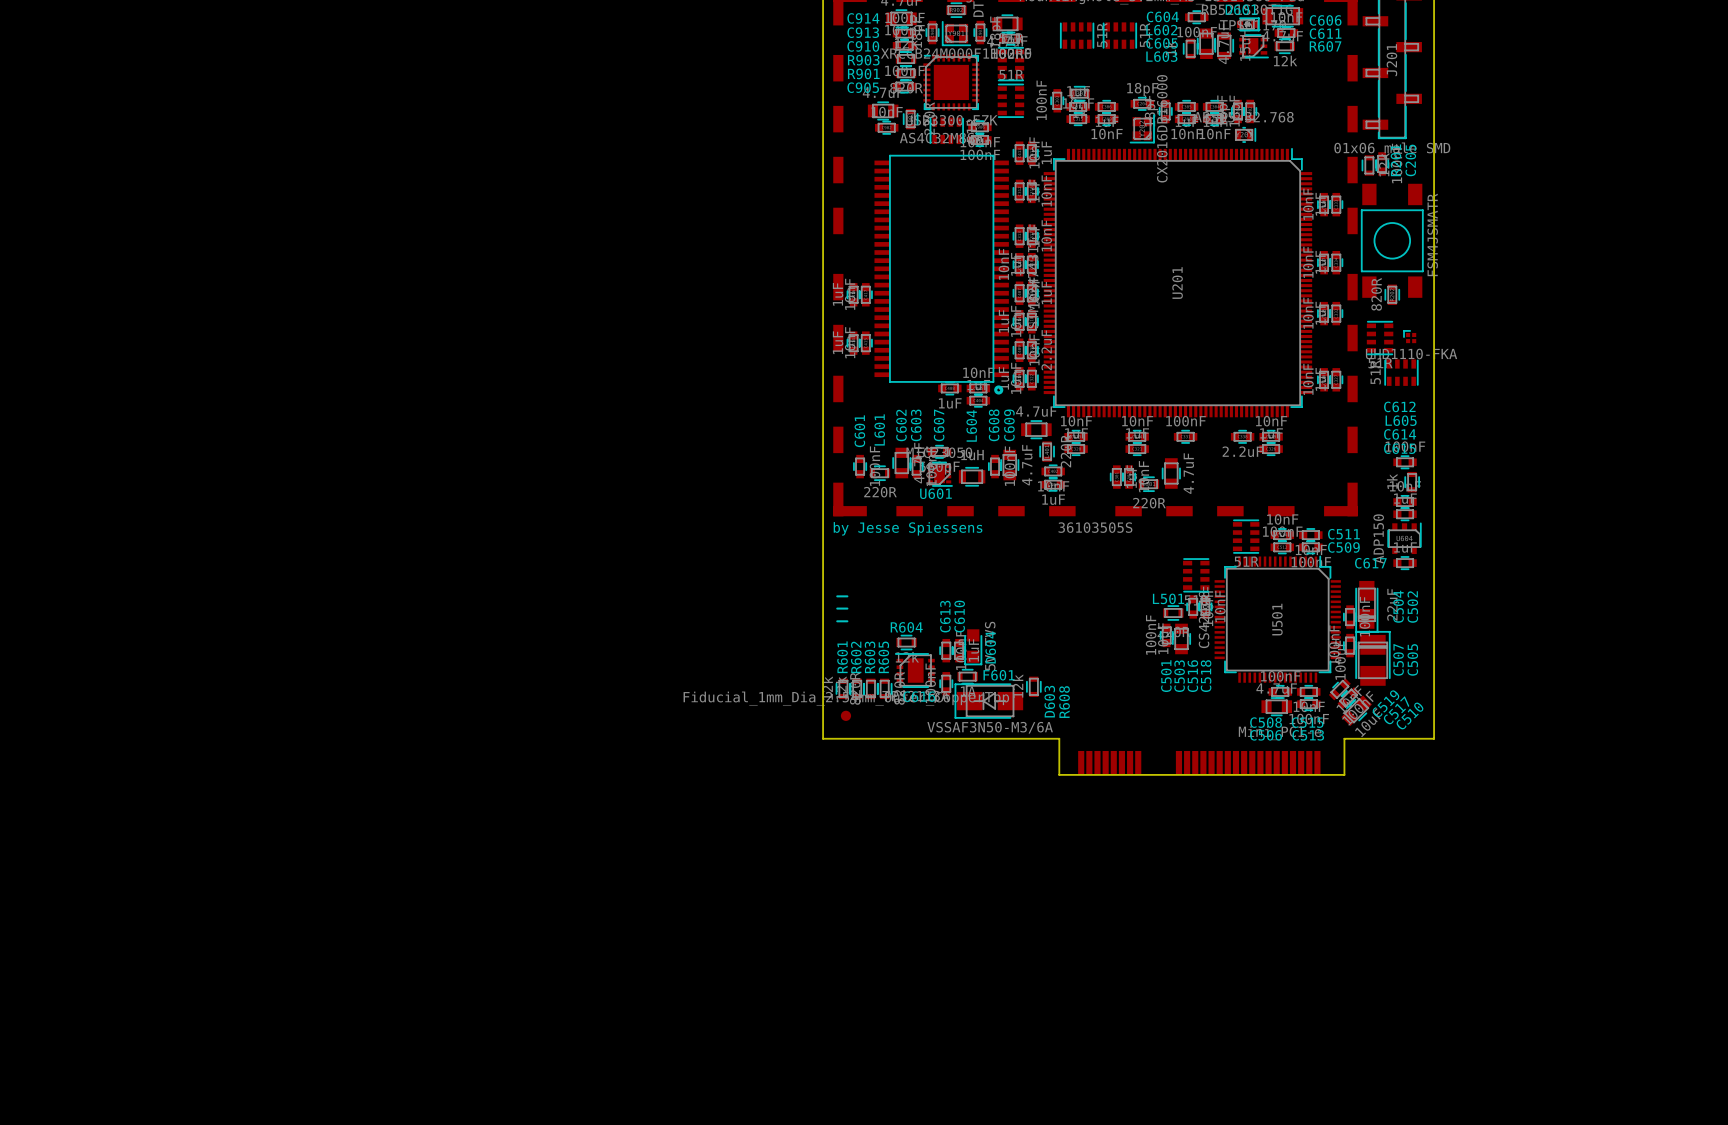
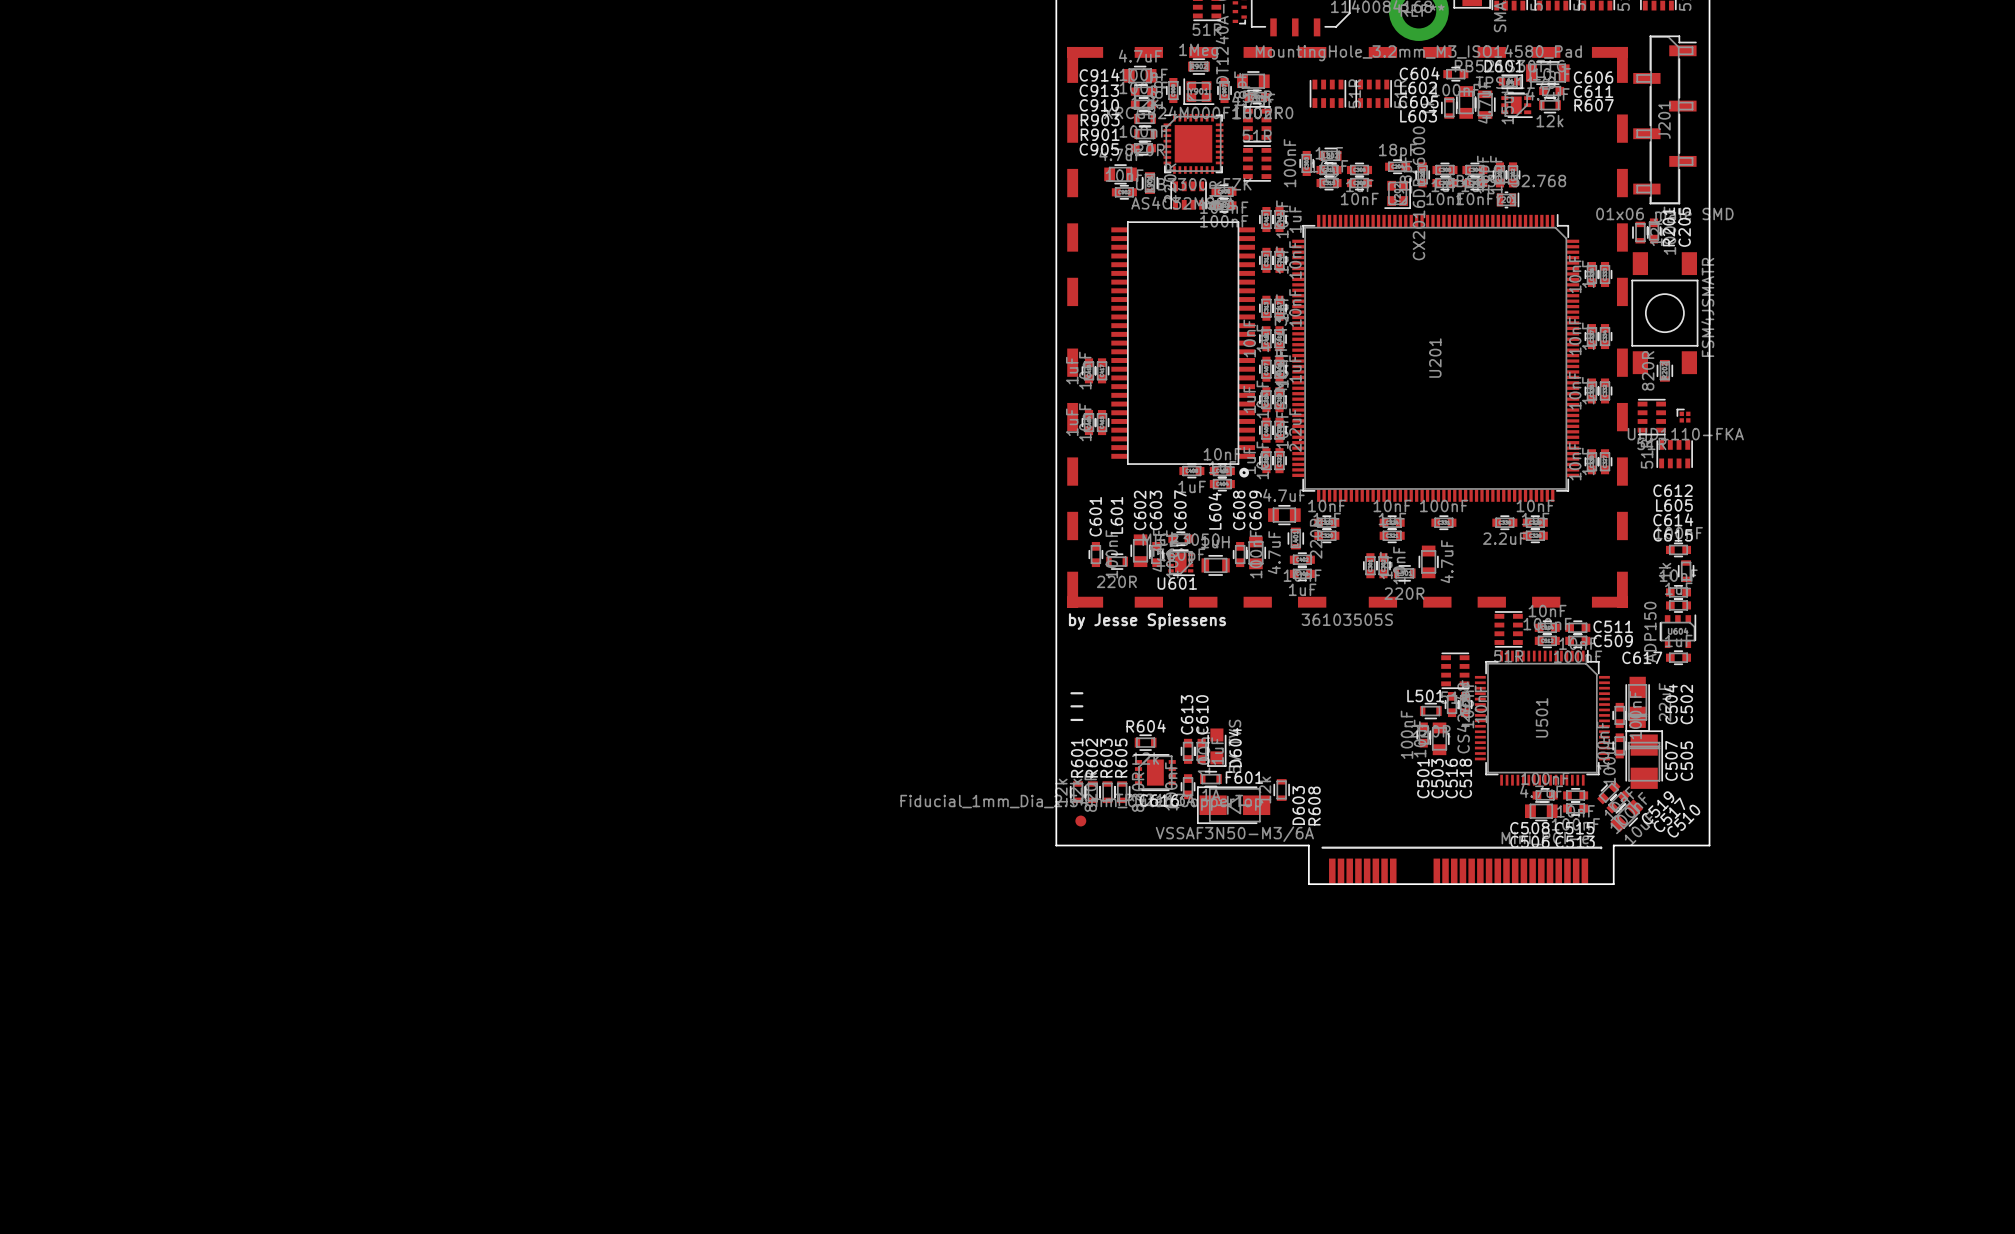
line: none -> (1322, 847) (1601, 848)

